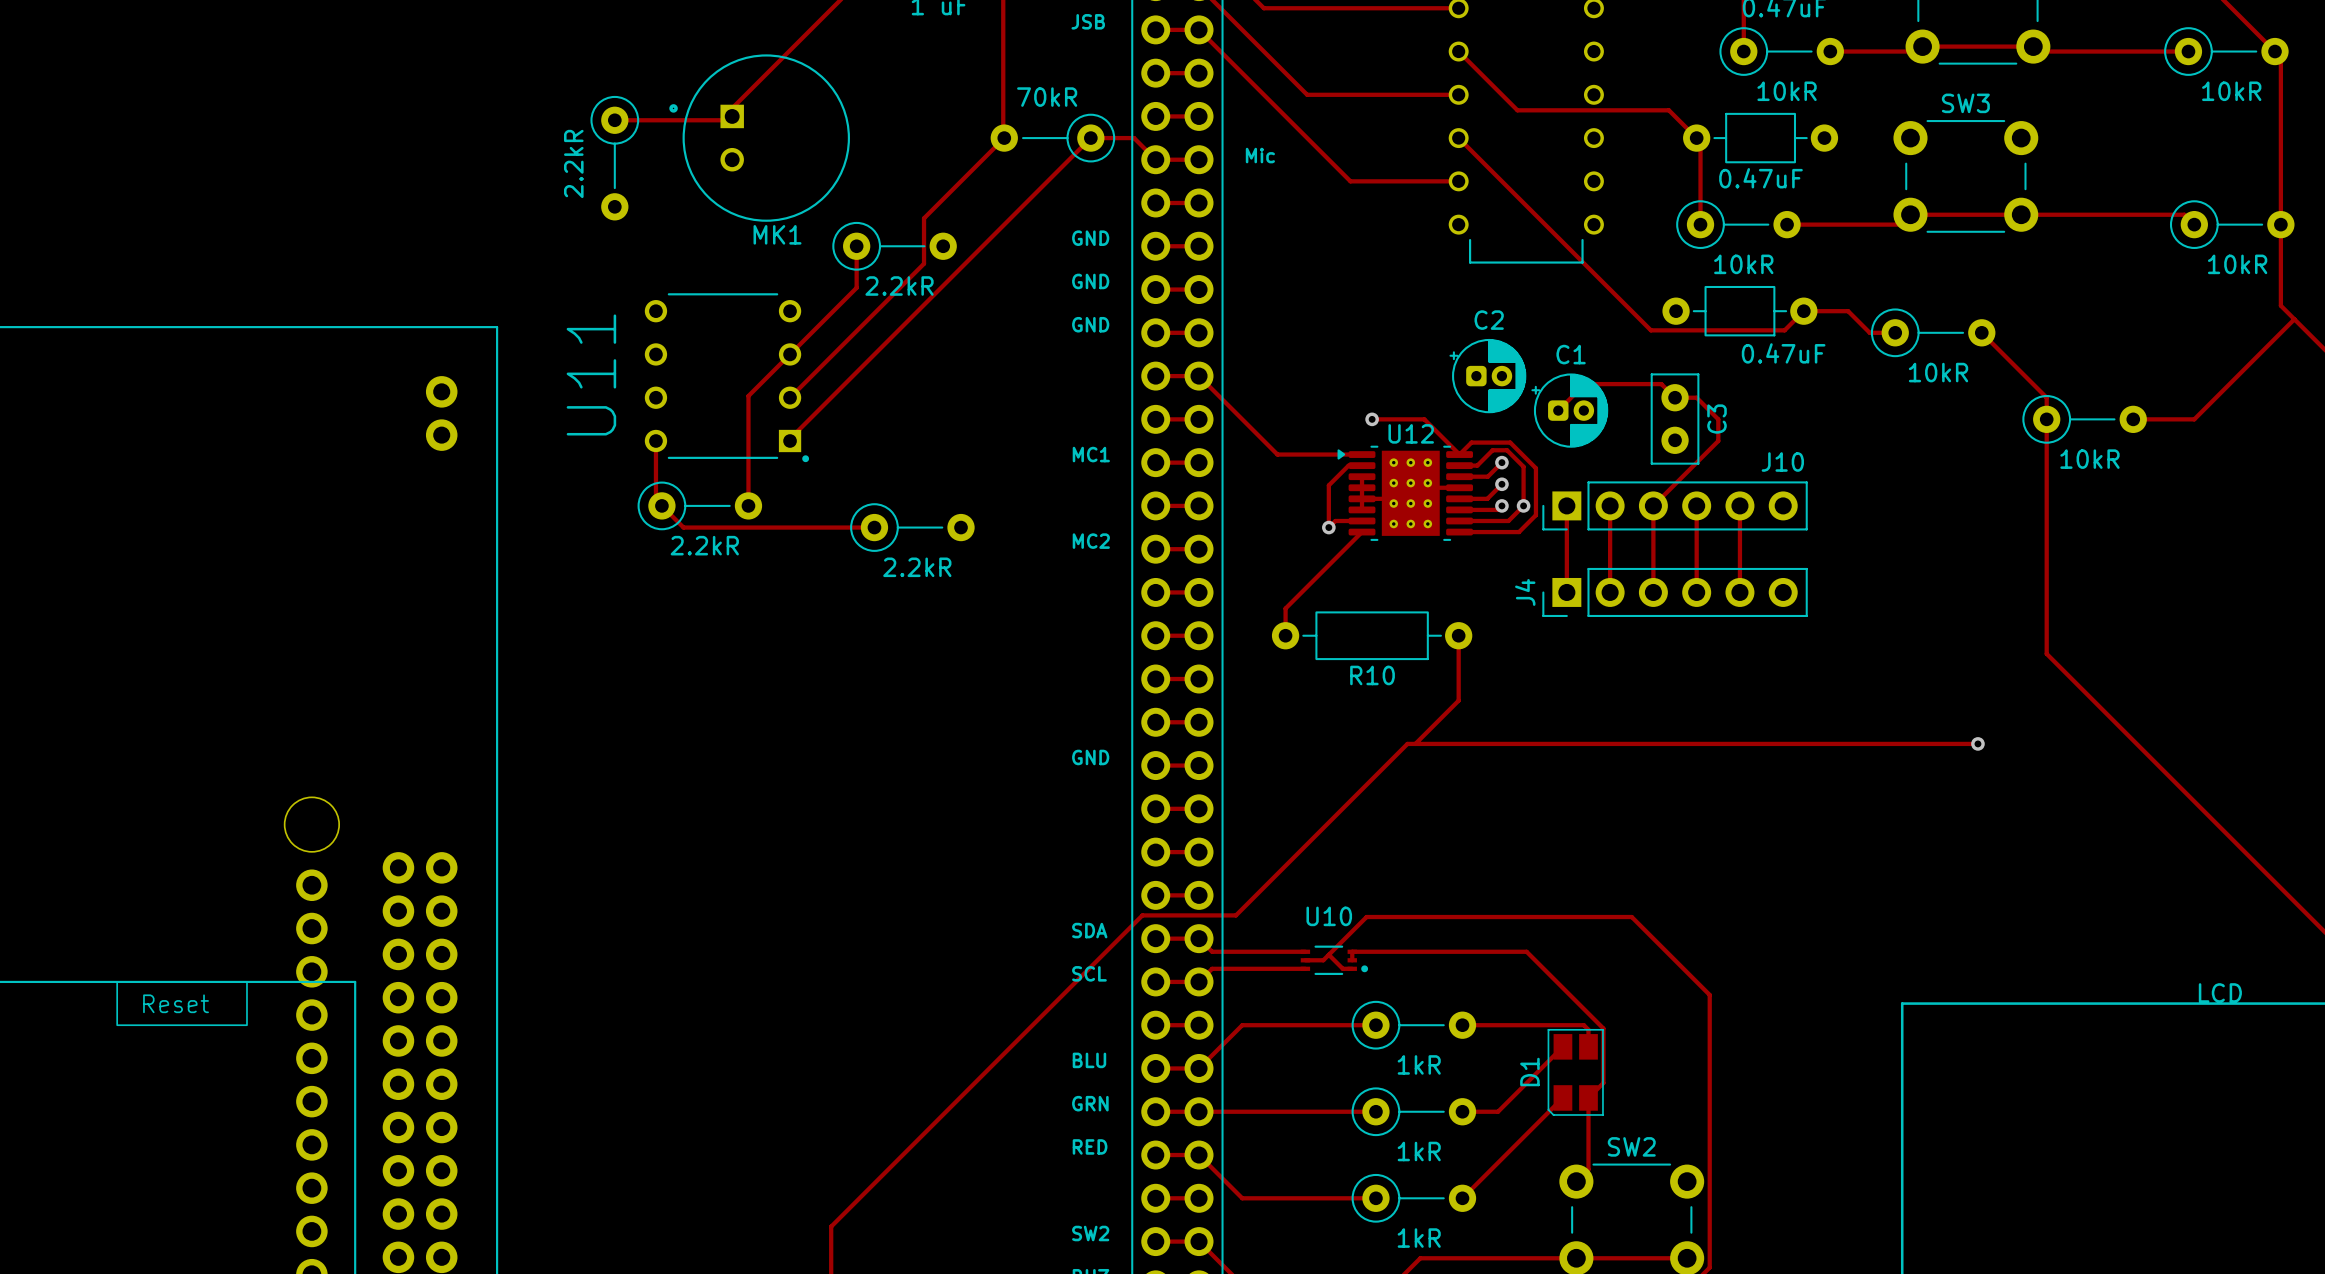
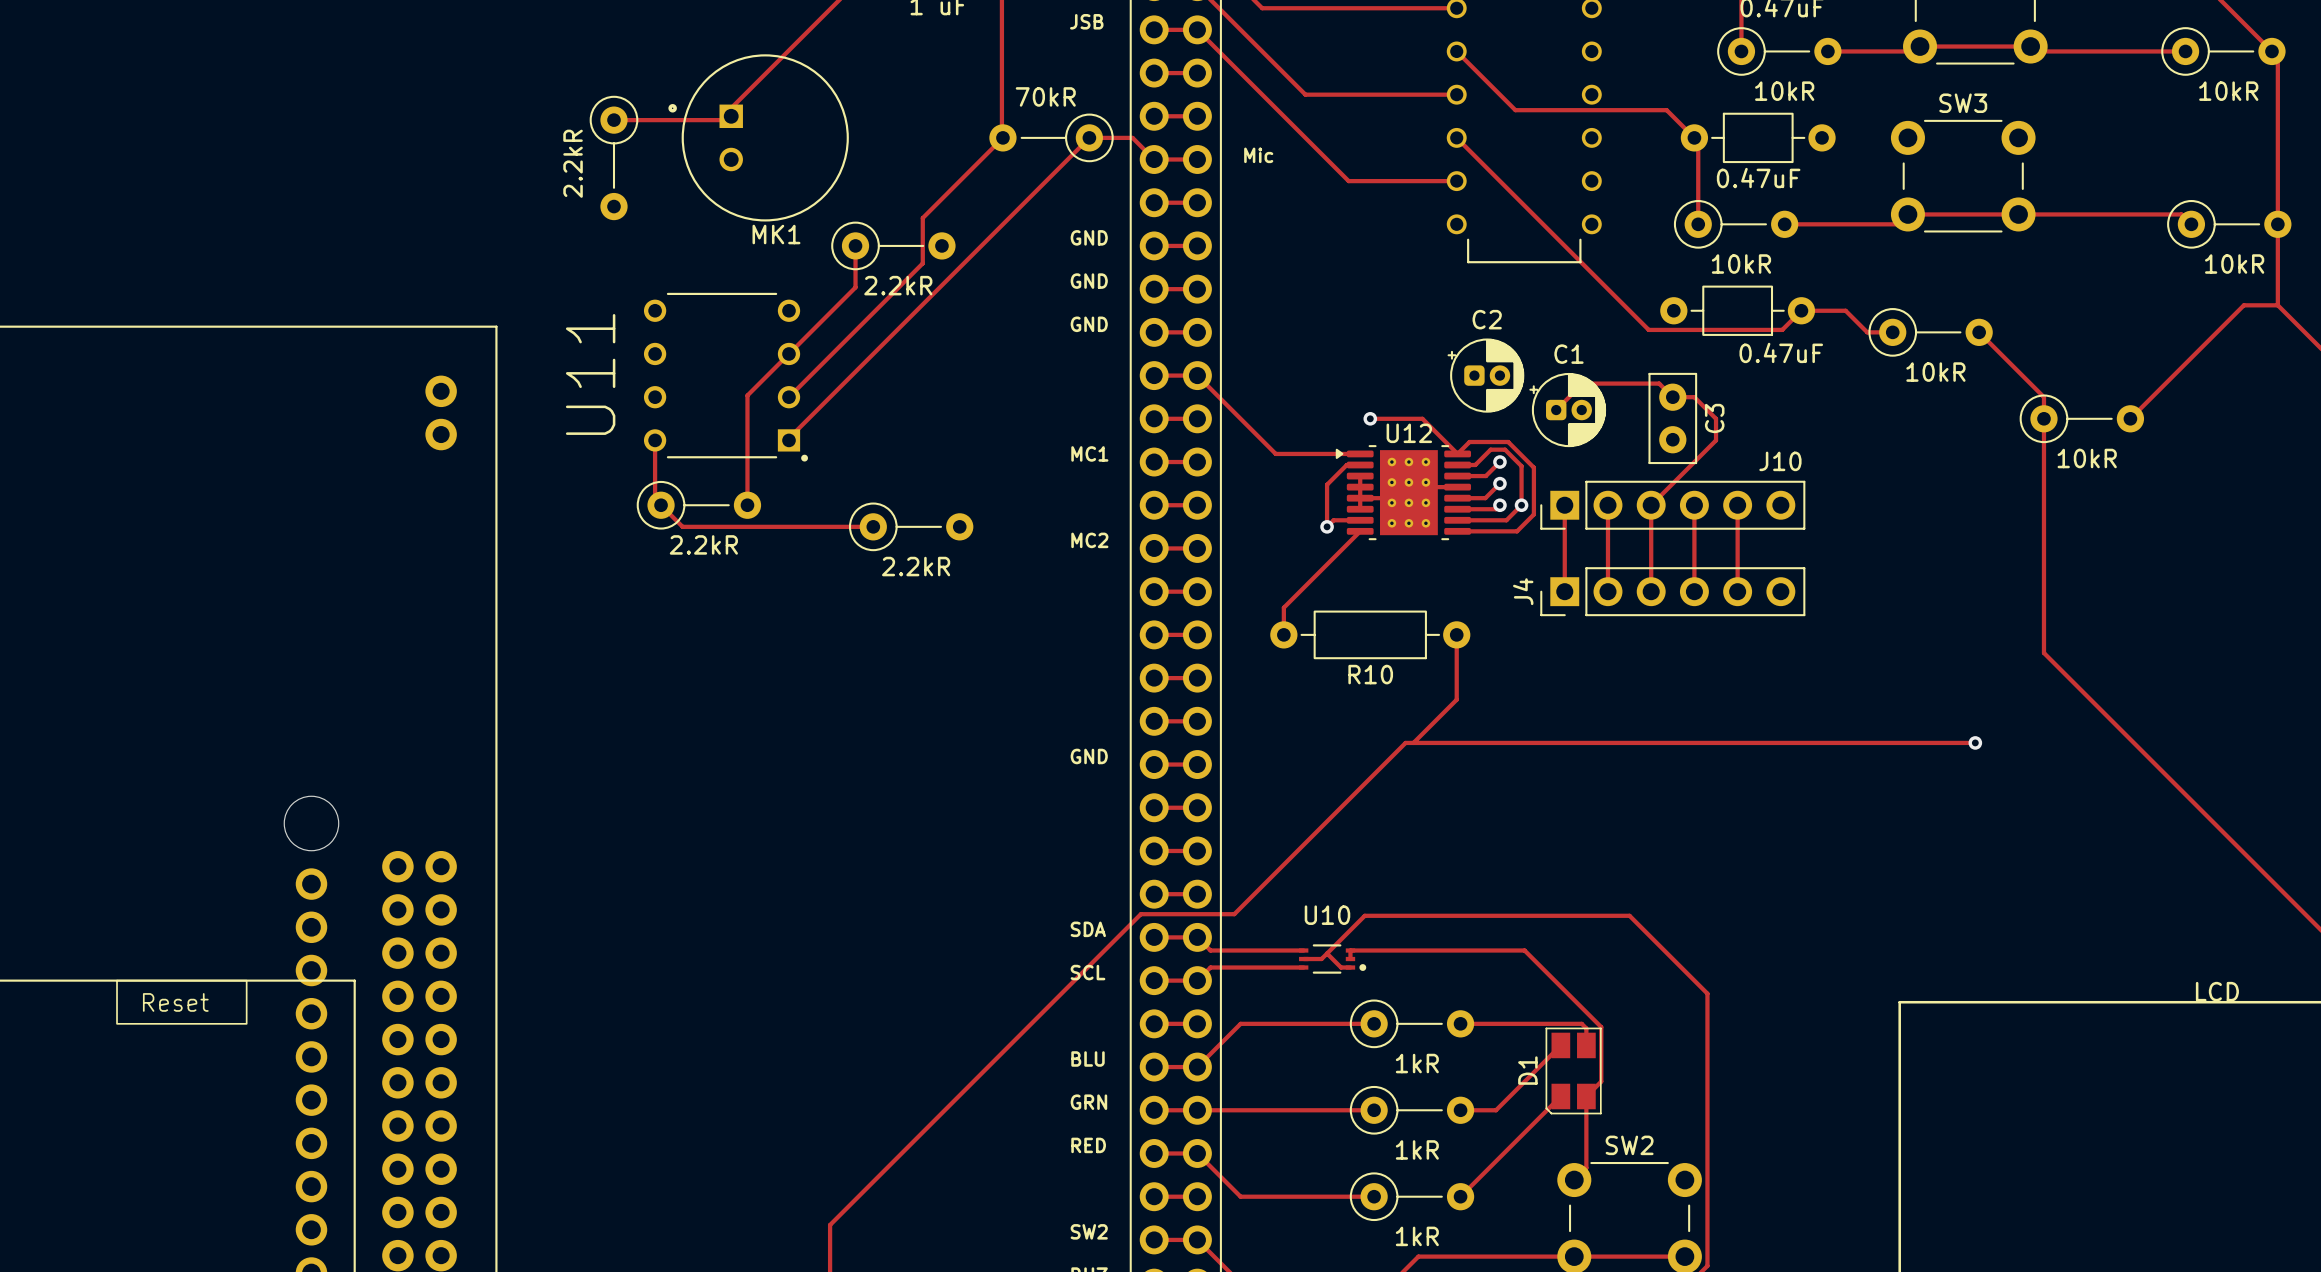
track: (2294, 319) (2194, 419) (2133, 419) -> (2277, 305) (2243, 305) (2130, 418)

